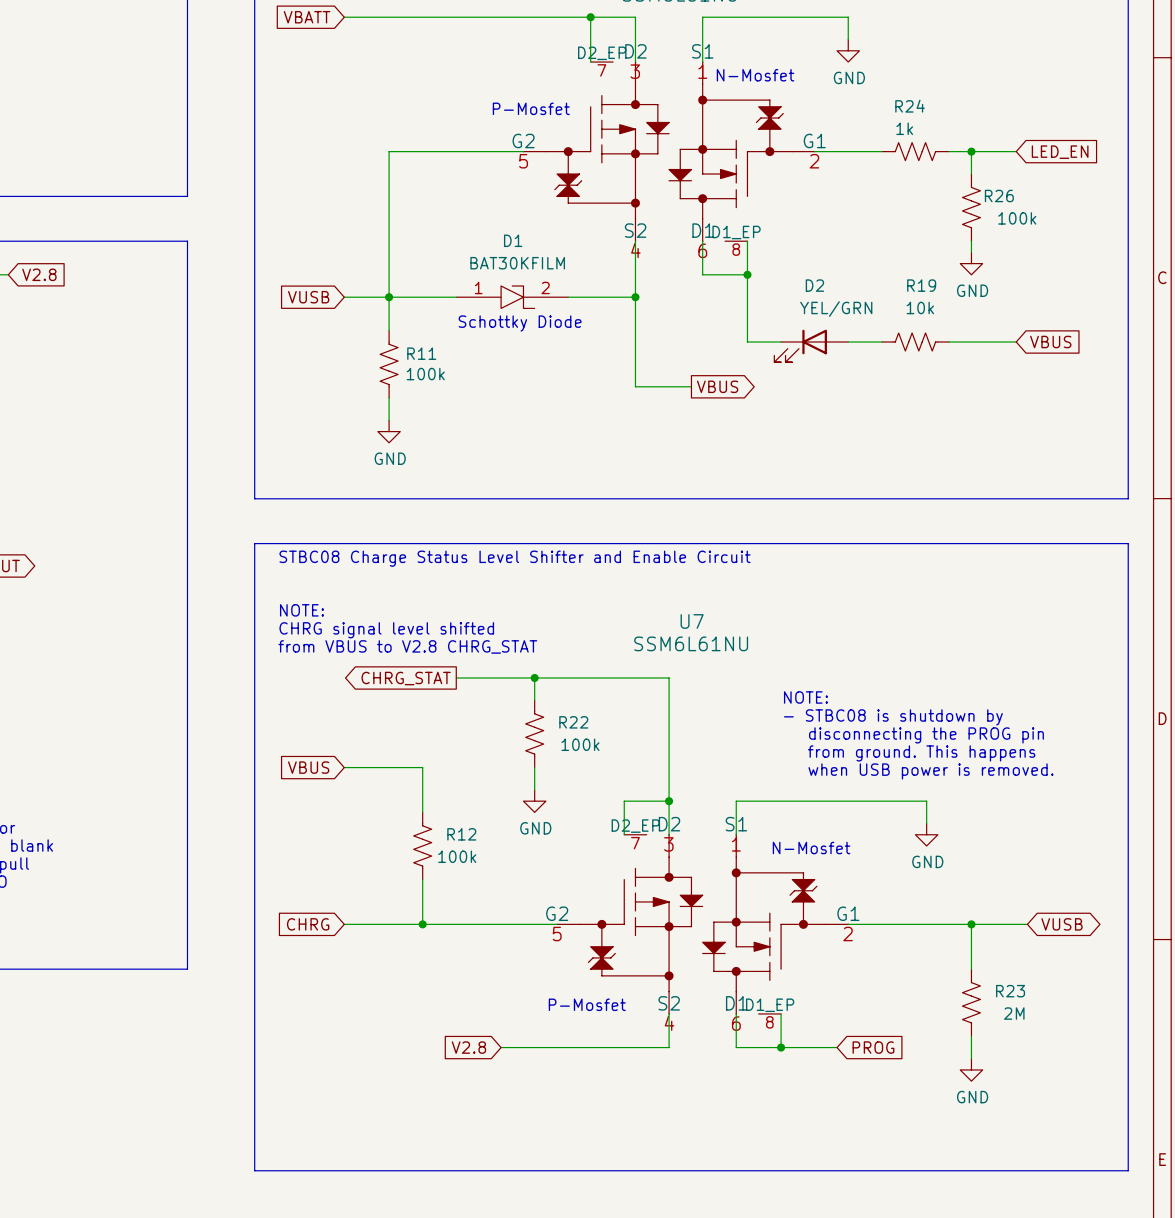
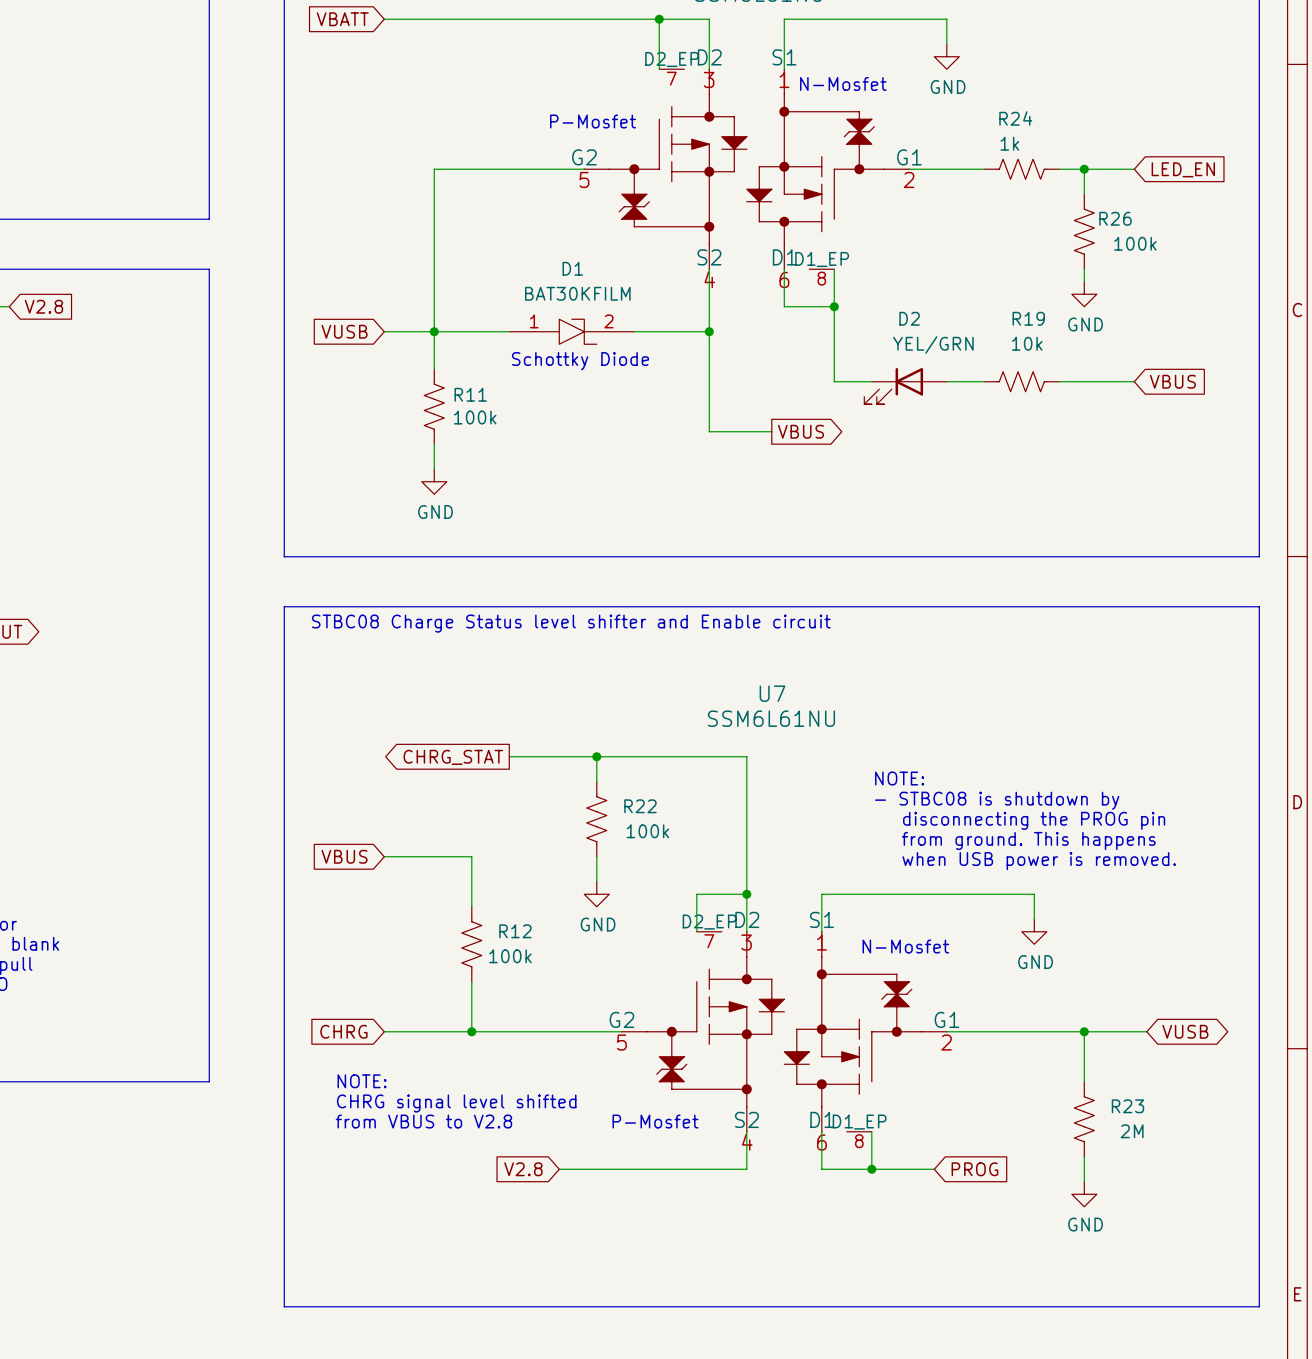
text: STBC08 Charge Status Level Shifter and Enable Circuit (515, 558) -> STBC08 Charge Status level shifter and Enable circuit (571, 623)
text: NOTE: (301, 610) -> none
text: CHRG signal level shifted (386, 630) -> none
text: from VBUS to V2.8 CHRG_STAT (407, 646) -> none
text: none -> NOTE: (362, 1081)
text: none -> CHRG signal level shifted (456, 1103)
text: none -> from VBUS to V2.8 (423, 1121)

